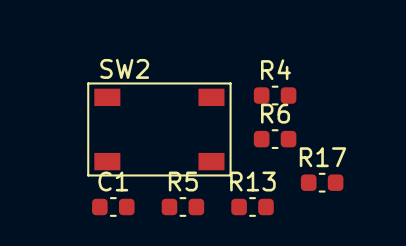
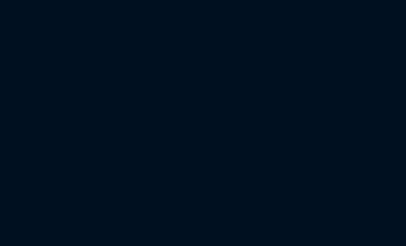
R4: (275, 95) -> none
SW2: (159, 129) -> none
R6: (275, 139) -> none
R17: (322, 182) -> none
C1: (113, 206) -> none
R5: (182, 206) -> none
R13: (252, 206) -> none

